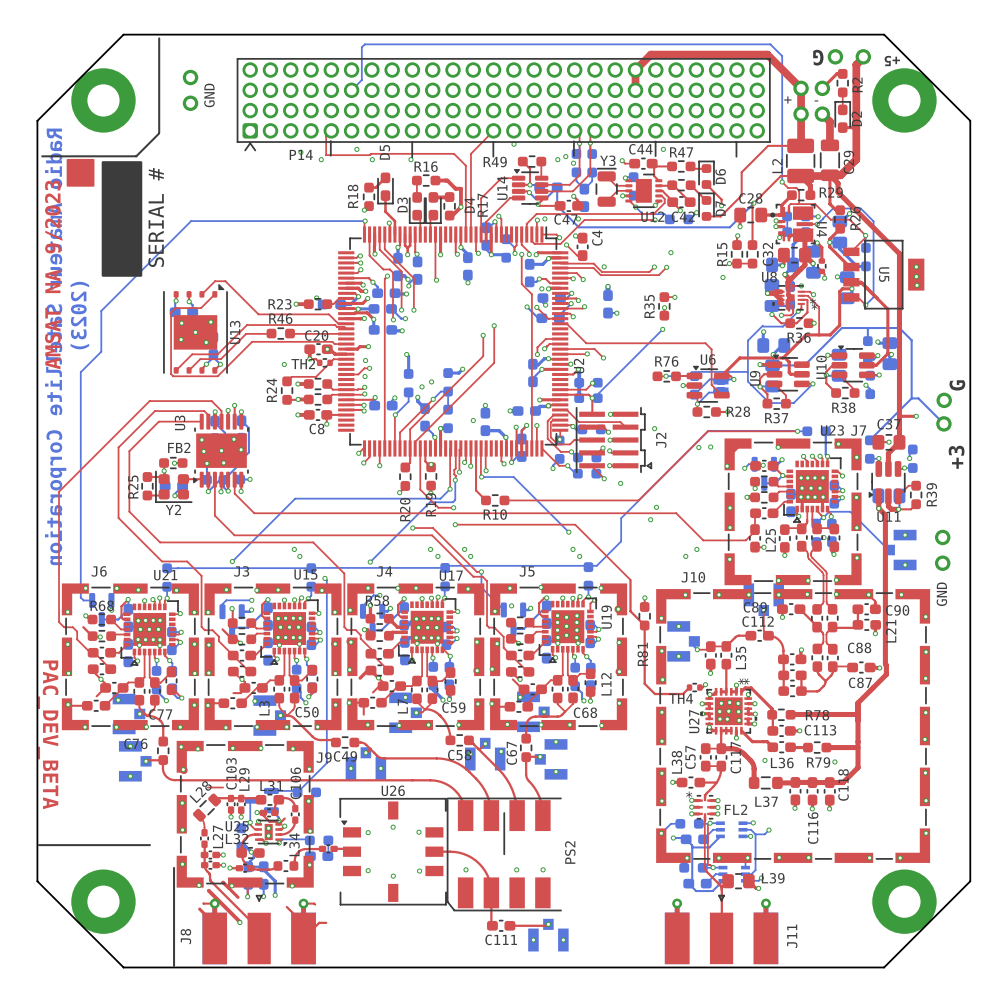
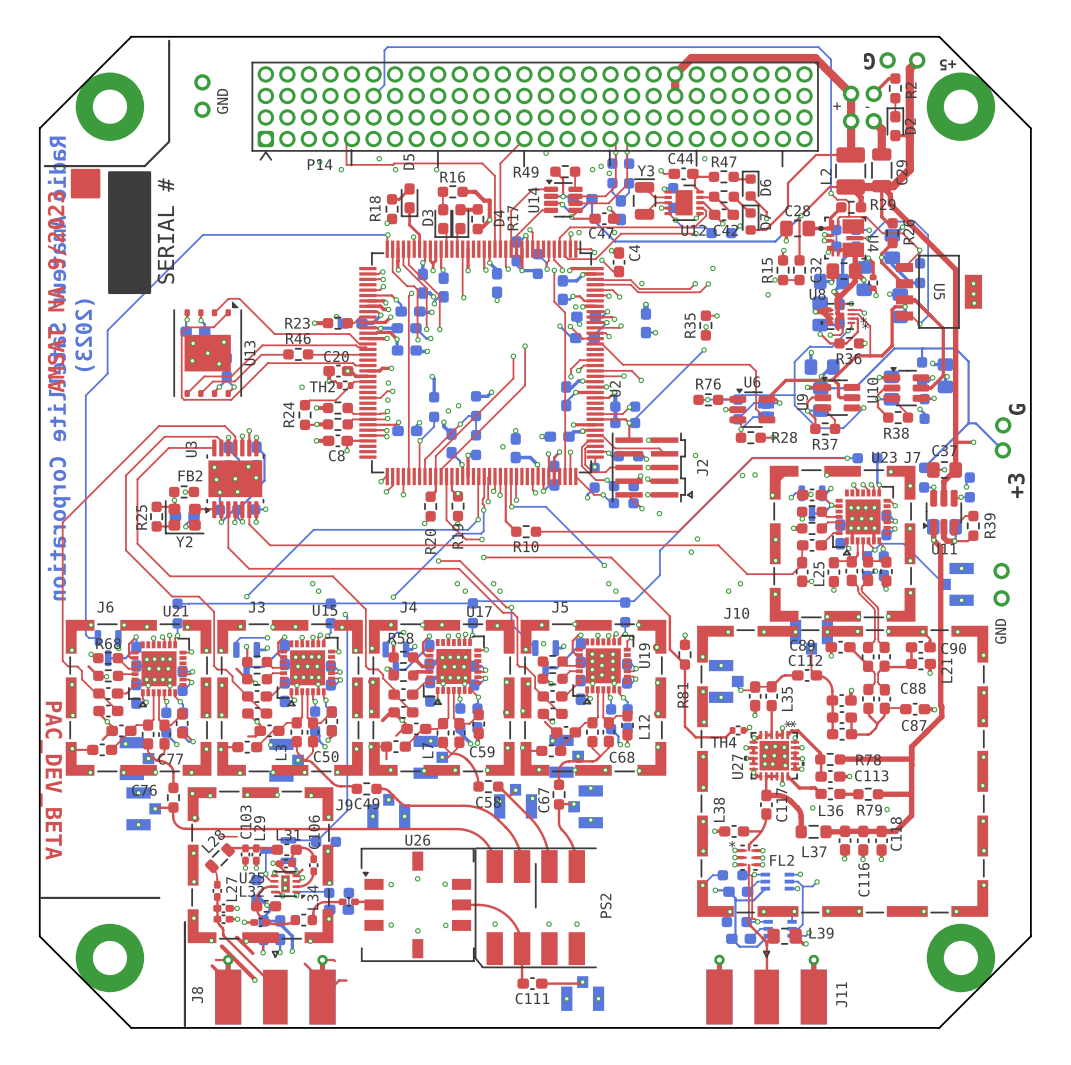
top track: (705, 748) (721, 748) -> none
C57: (705, 757) -> none
top track: (705, 766) (721, 766) -> none

